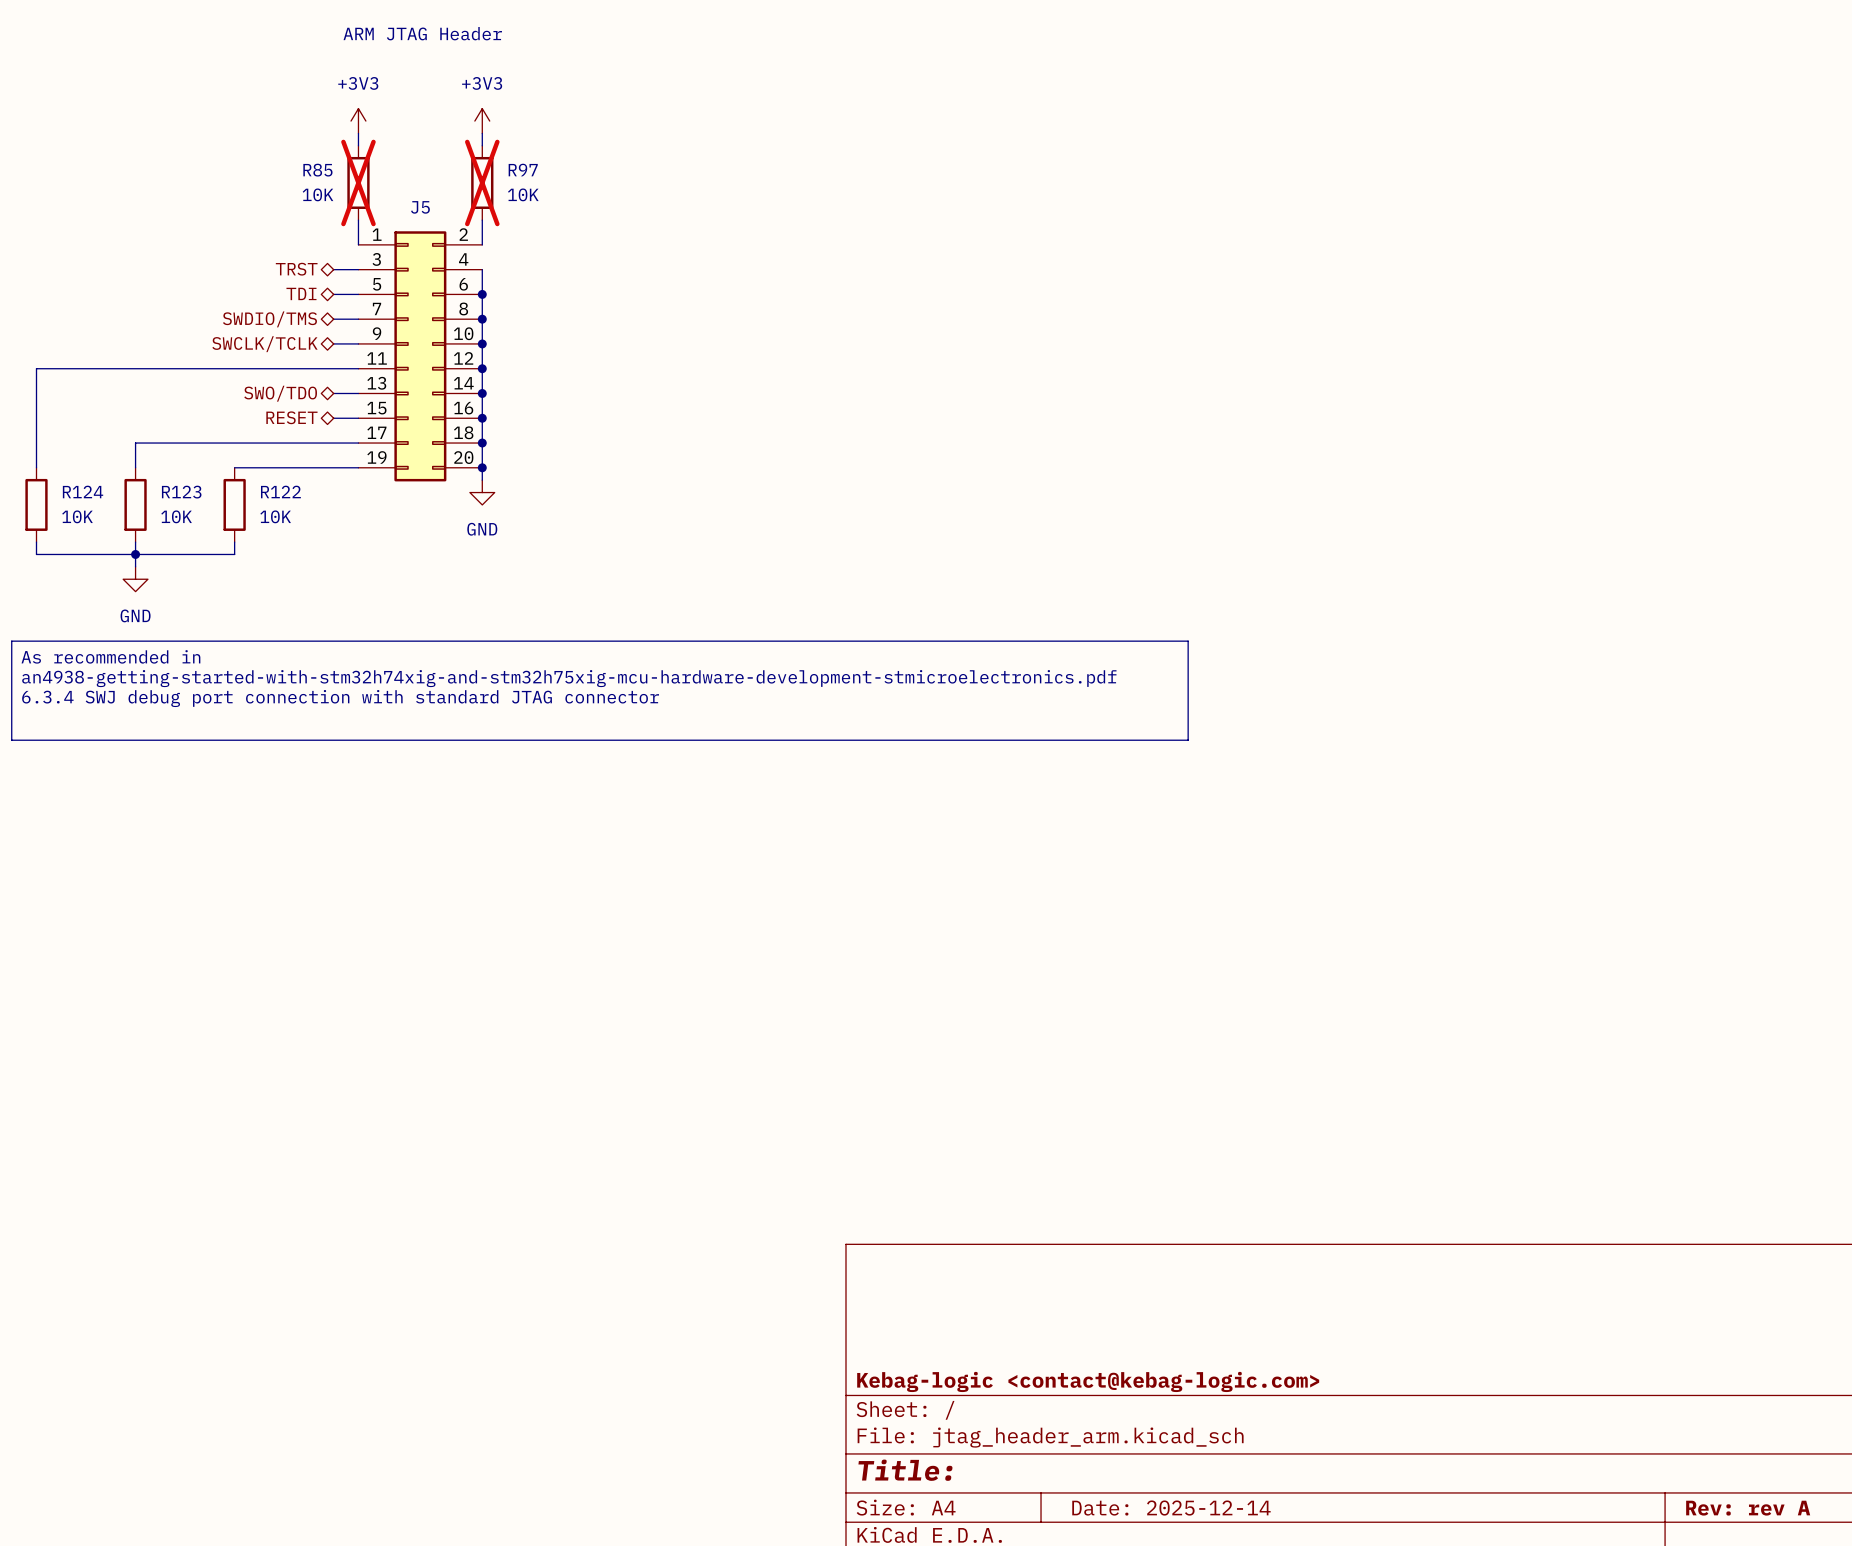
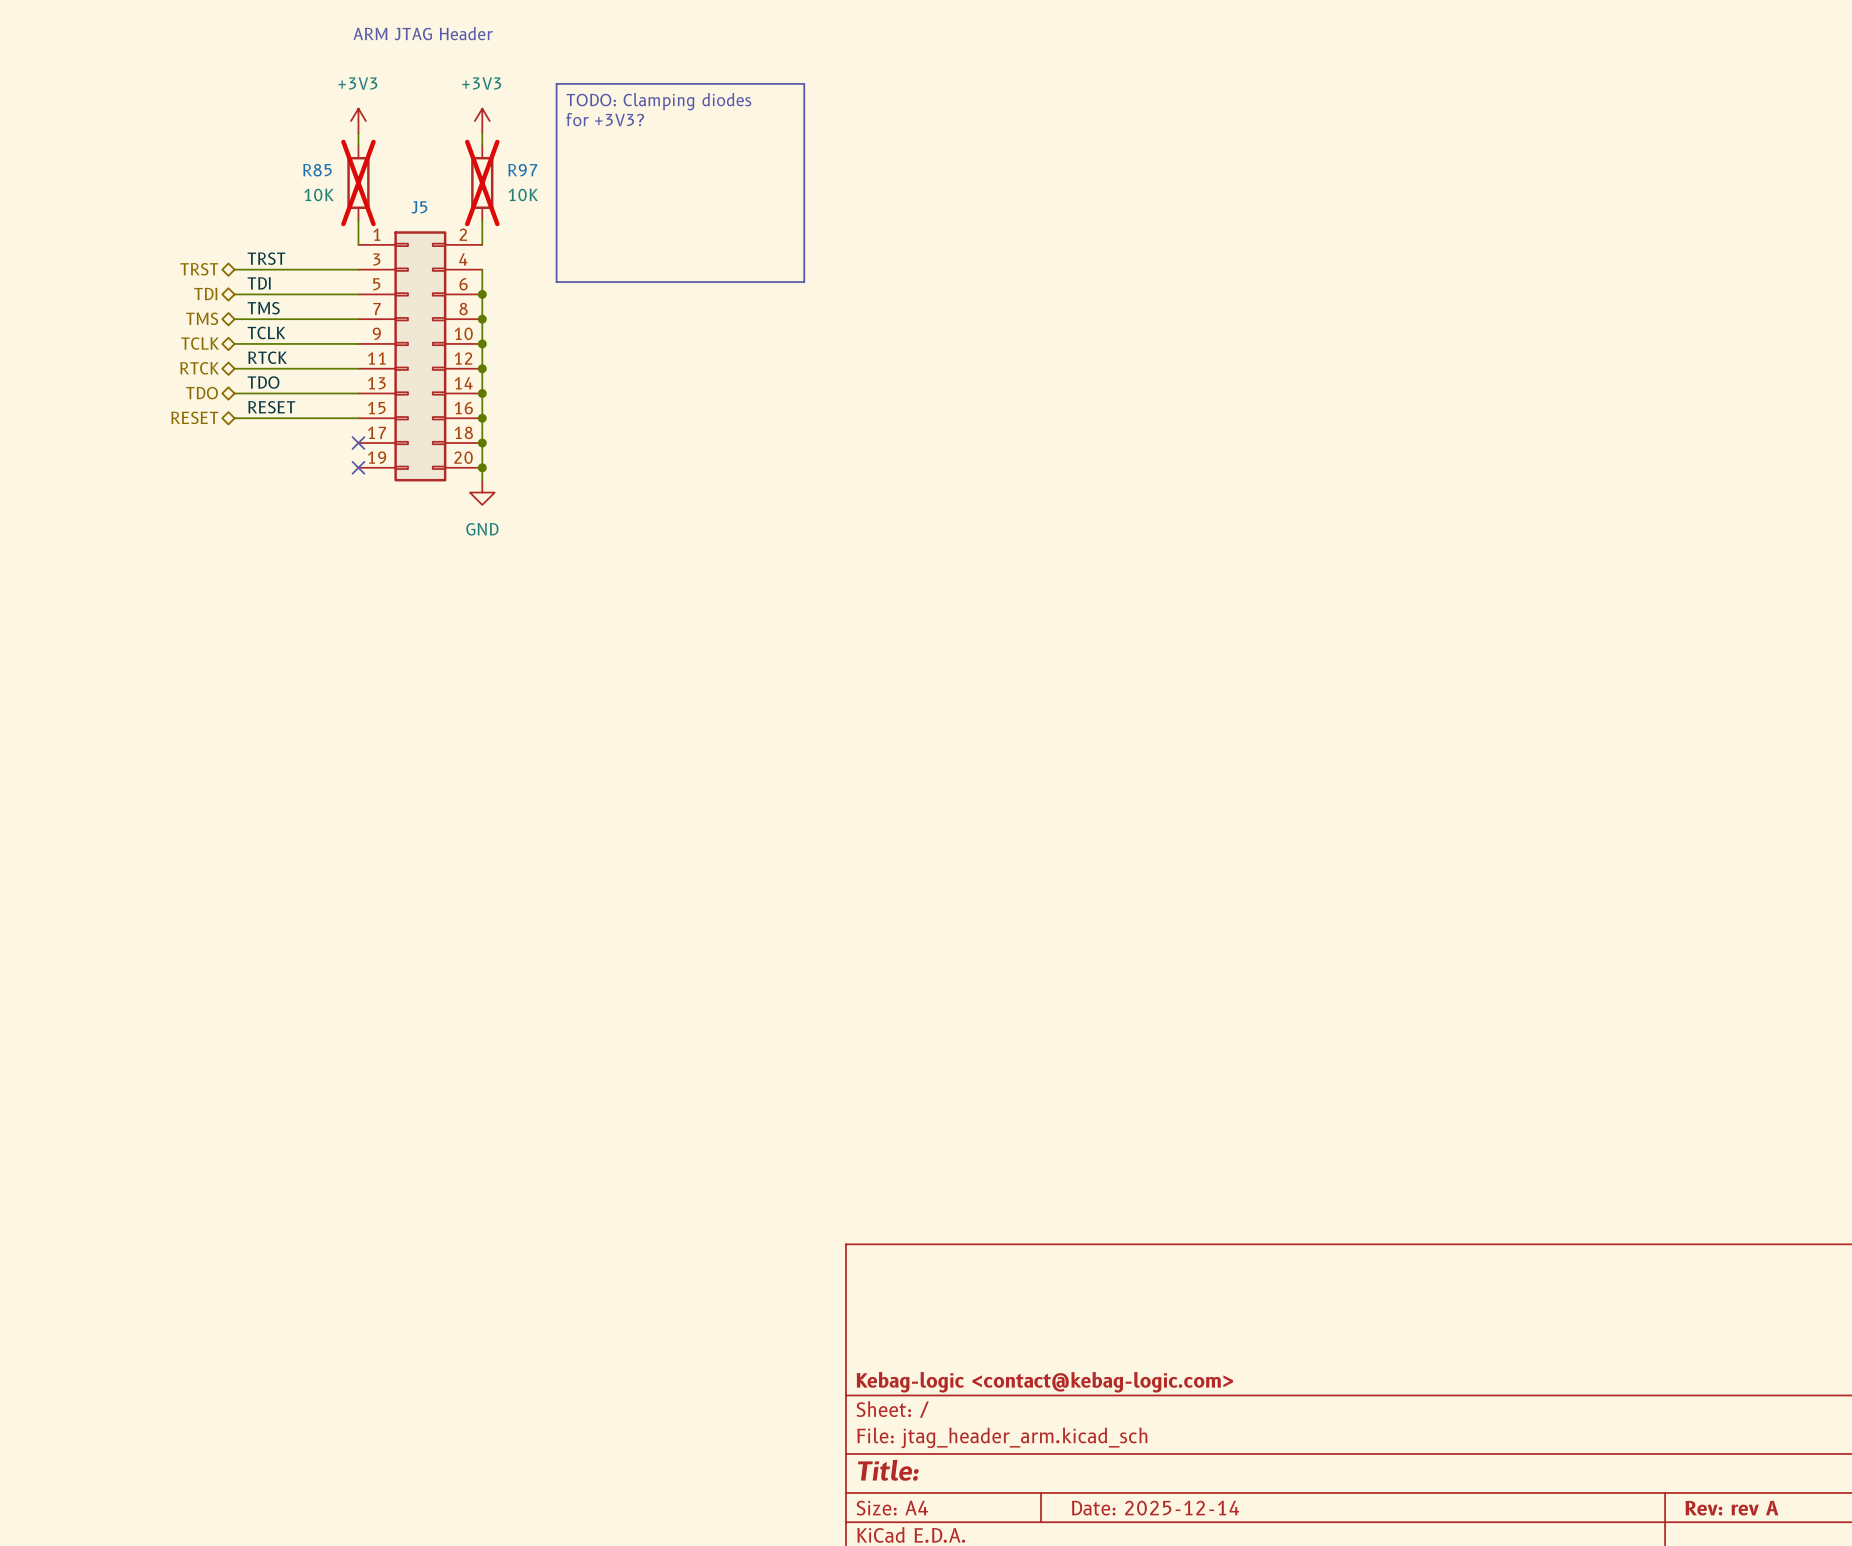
line: none -> (556, 83) (804, 83) (804, 282) (556, 282) (556, 83)
text: none -> TODO: Clamping diodes (658, 101)
text: none -> for +3V3? (605, 119)
label: none -> TRST (266, 258)
wire: none -> (234, 269) (333, 269)
hierarchical label position: TRST (296, 269) -> TRST (199, 269)
label: none -> TDI (259, 283)
hierarchical label position: TDI (301, 293) -> TDI (205, 293)
wire: none -> (234, 294) (333, 294)
label: none -> TMS (263, 308)
hierarchical label: none -> TMS (202, 318)
wire: none -> (234, 319) (333, 319)
hierarchical label: SWDIO/TMS (269, 319) -> none
label: none -> TCLK (266, 332)
hierarchical label: none -> TCLK (200, 343)
wire: none -> (234, 343) (333, 343)
hierarchical label: SWCLK/TCLK (264, 344) -> none
label: none -> RTCK (267, 357)
hierarchical label: none -> RTCK (199, 368)
wire: (234, 368) (36, 368) (36, 467) -> none
label: none -> TDO (263, 382)
hierarchical label: none -> TDO (202, 393)
wire: none -> (234, 393) (333, 393)
hierarchical label: SWO/TDO (280, 393) -> none
label: none -> RESET (271, 407)
hierarchical label position: RESET (291, 417) -> RESET (194, 417)
wire: none -> (234, 418) (333, 418)
wire: (358, 443) (135, 443) (135, 467) -> none
no-connect mark: none -> (358, 443)
wire: (234, 467) (358, 467) -> none
no-connect mark: none -> (358, 467)
R124: 10K (36, 504) -> none
R123: 10K (135, 504) -> none
R122: 10K (234, 504) -> none
wire: (36, 542) (36, 554) (234, 554) (234, 542) -> none
wire: (135, 542) (135, 566) -> none
junction: (135, 554) -> none
power symbol: GND (135, 579) -> none
line: (11, 641) (1188, 641) (1188, 740) (11, 740) (11, 641) -> none
text: As recommended in (110, 656) -> none
text: an4938-getting-started-with-stm32h74xig-and-stm32h75xig-mcu-hardware-development-stmicroelectronics.pdf (569, 678) -> none
text: 6.3.4 SWJ debug port connection with standard JTAG connector (340, 698) -> none

